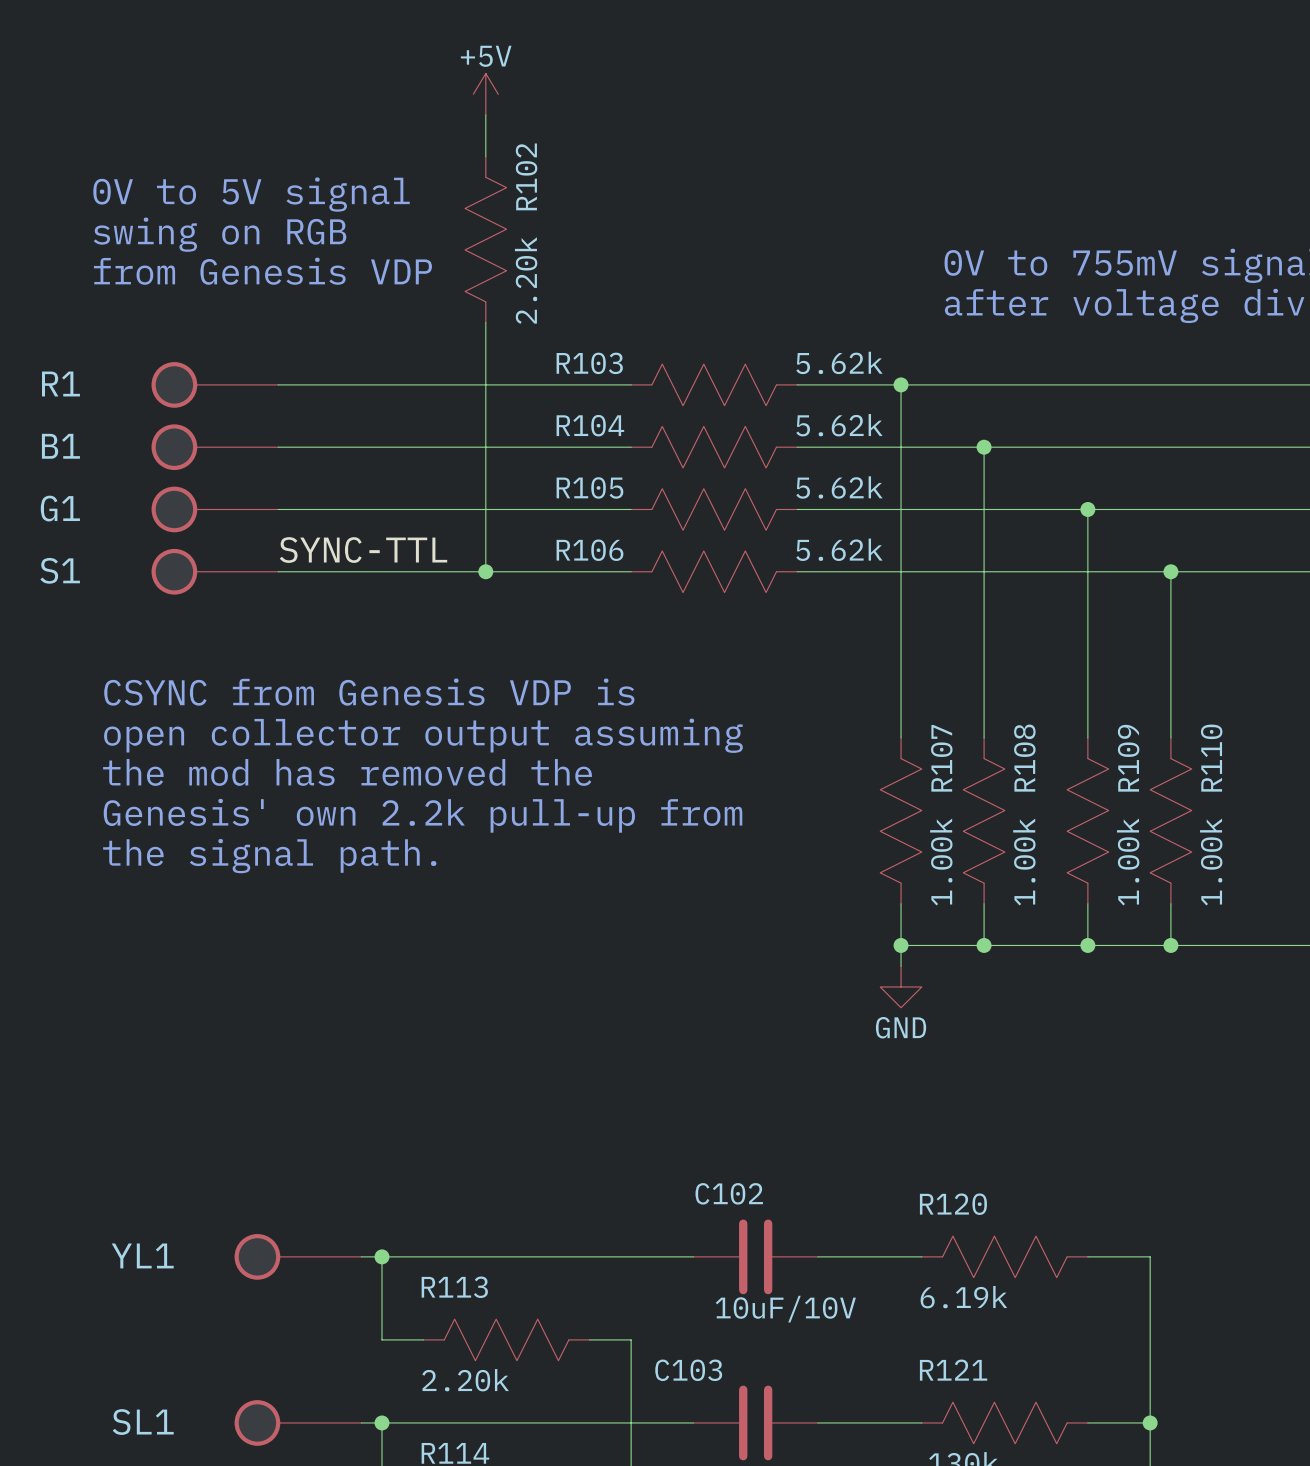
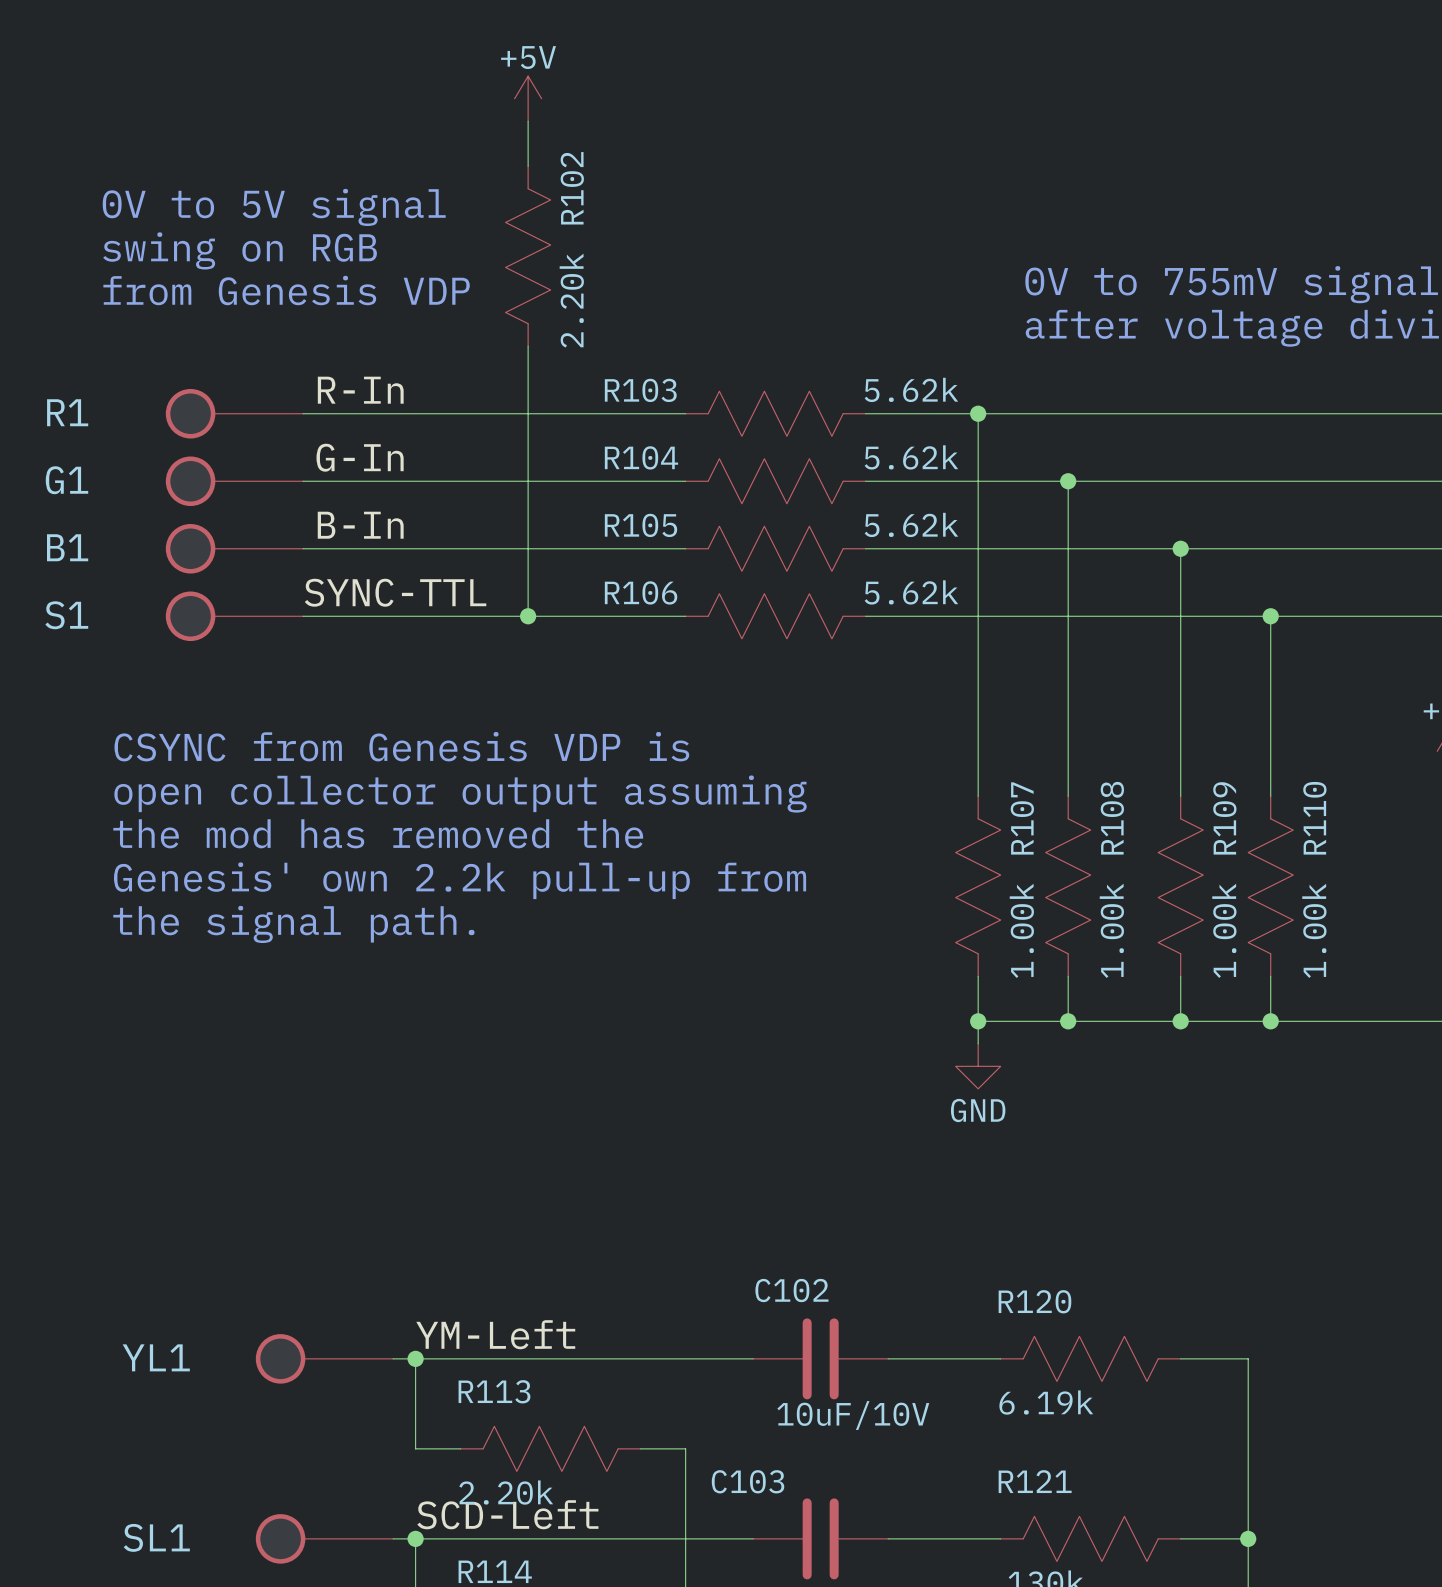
label: none -> R-In (360, 390)
label: none -> G-In (360, 457)
B1 name: B1 (60, 446) -> G1 (66, 480)
label: none -> B-In (360, 525)
G1 name: G1 (60, 508) -> B1 (67, 547)
label: none -> YM-Left (495, 1334)
label: none -> SCD-Left (507, 1514)

